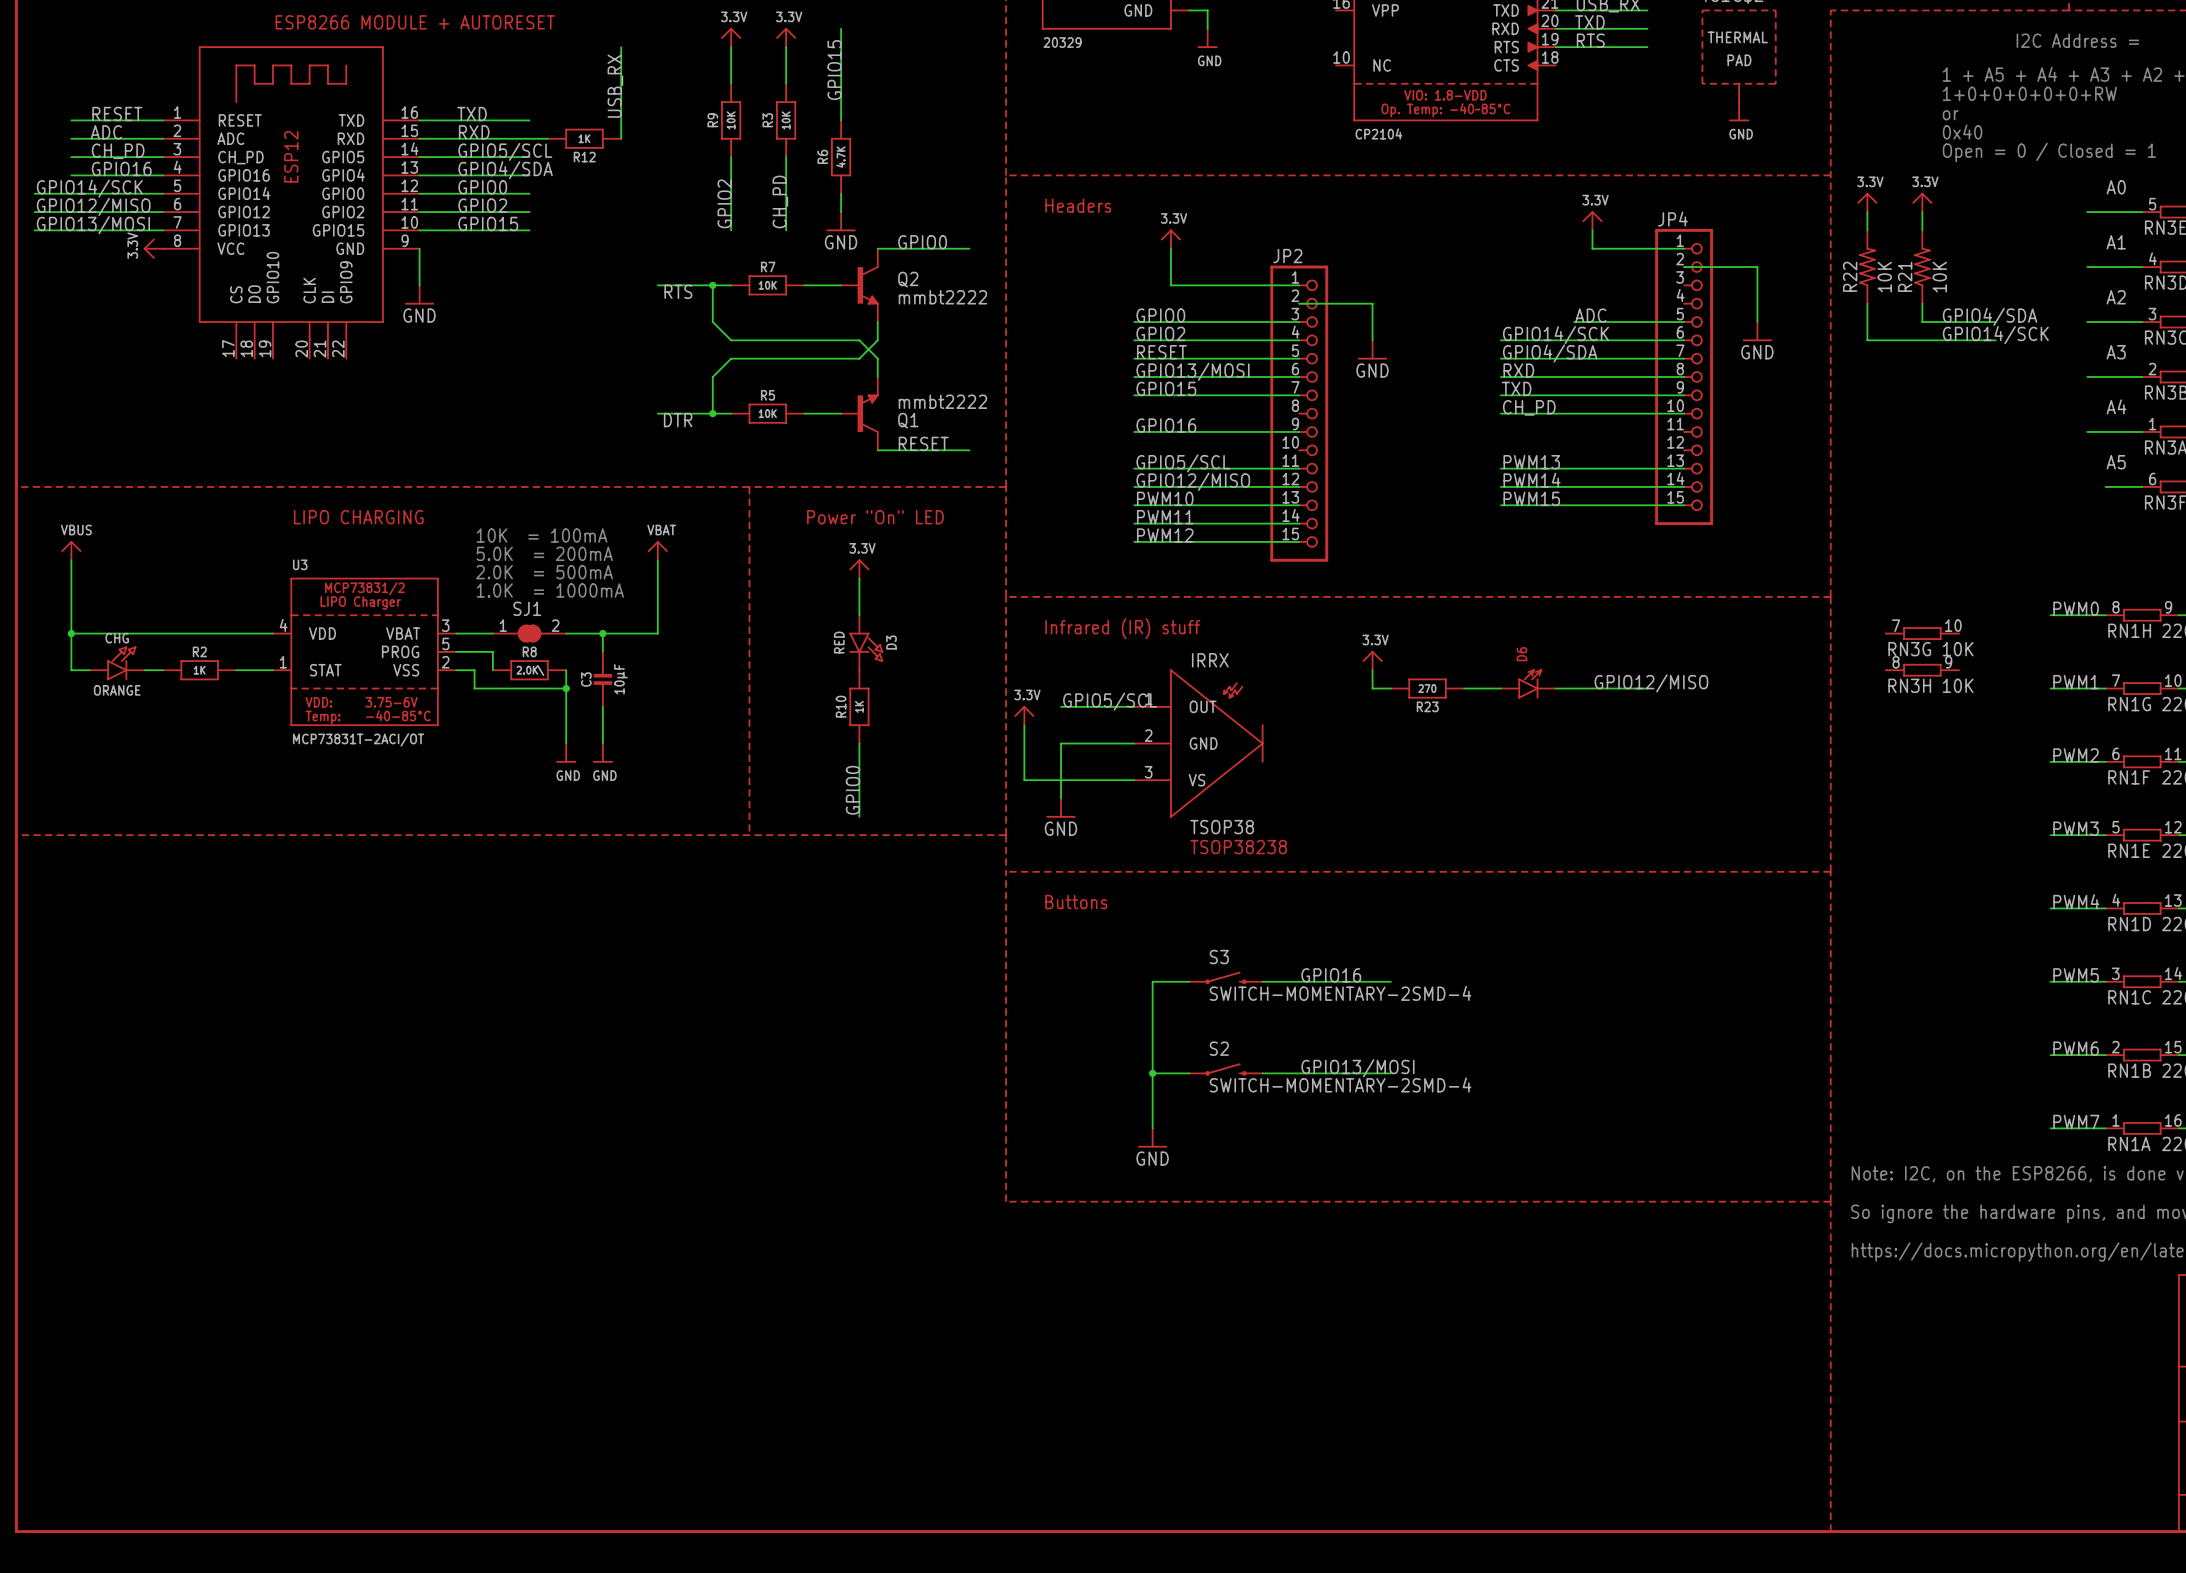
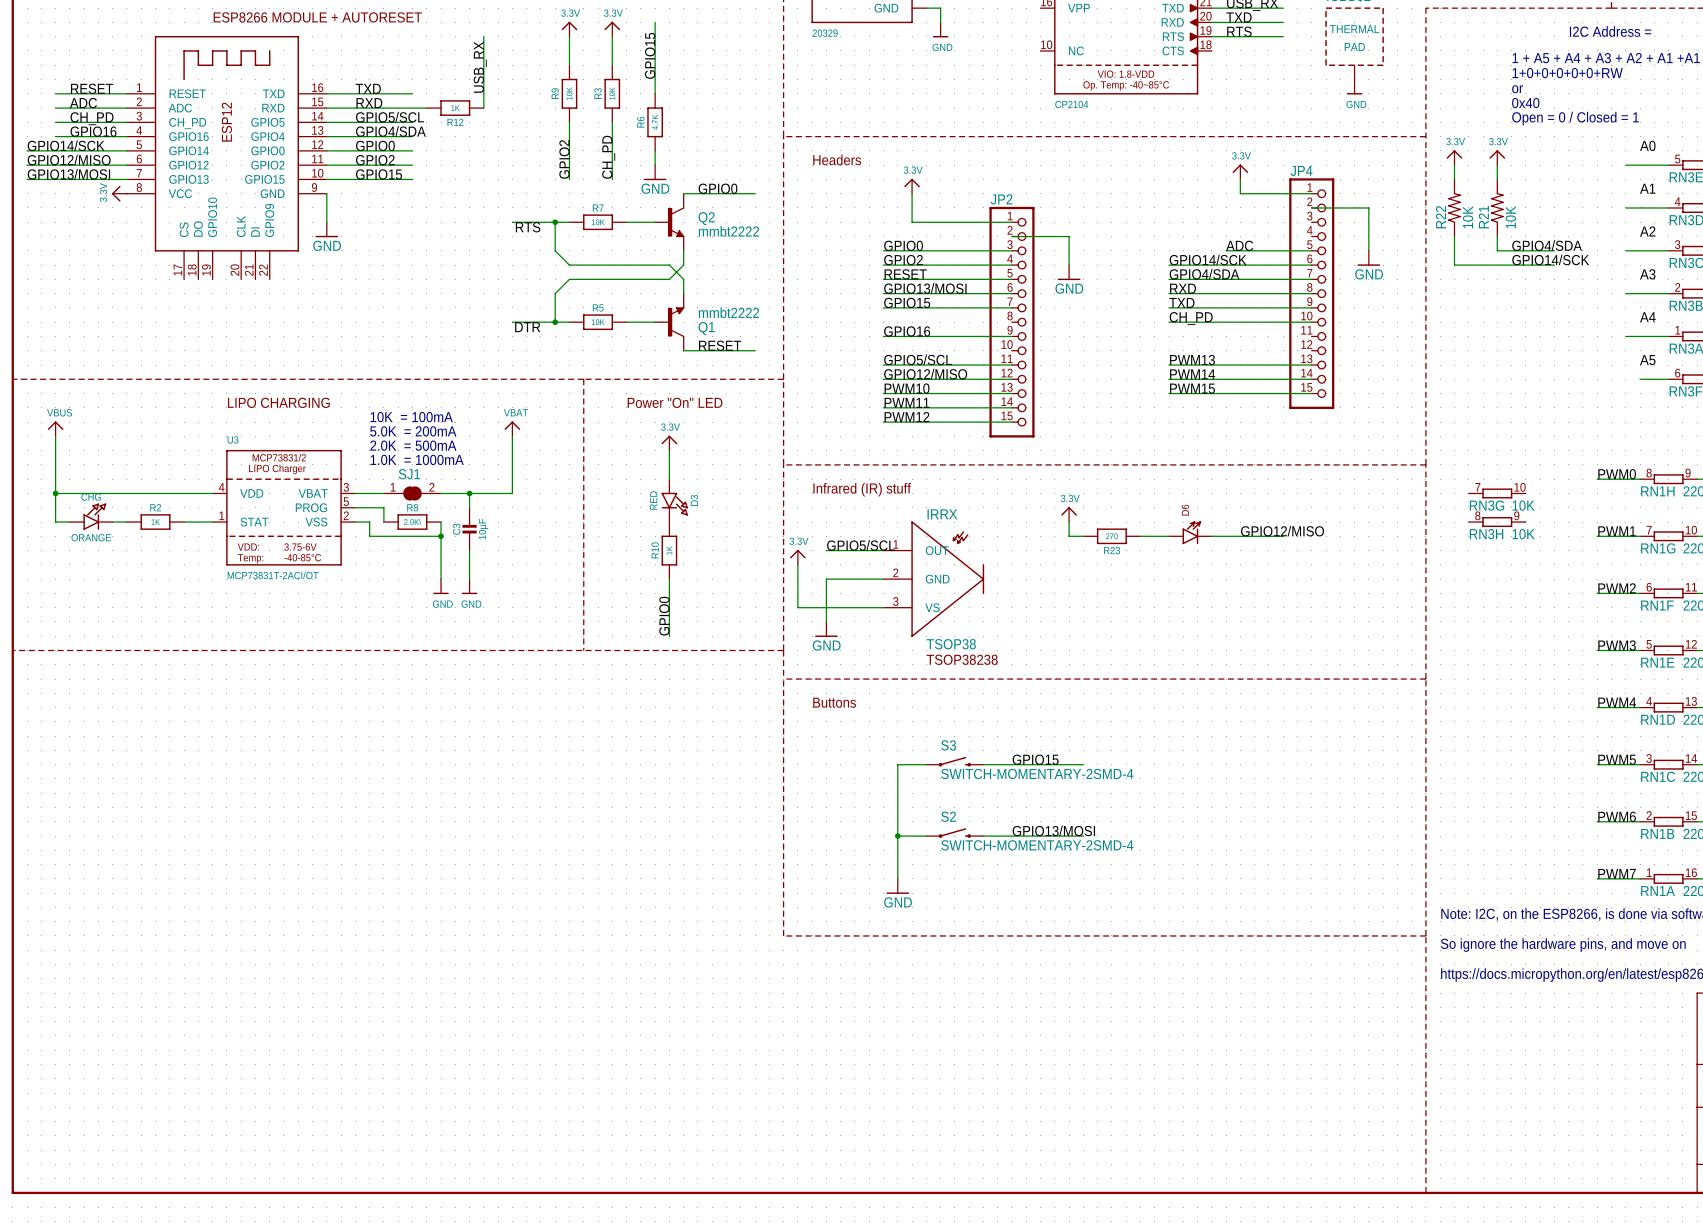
label: GPIO16 (1331, 975) -> GPIO15 (1035, 759)

